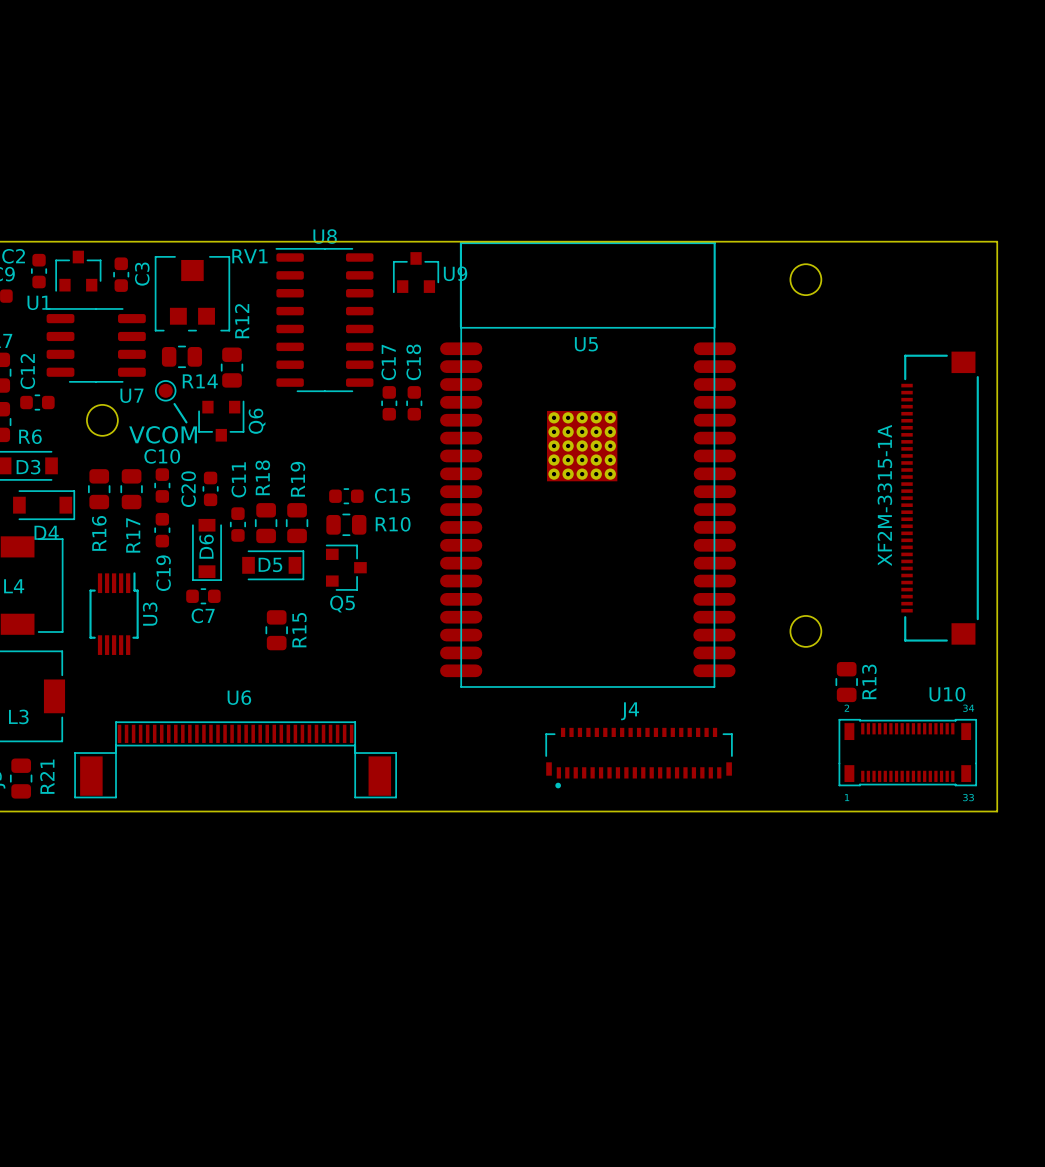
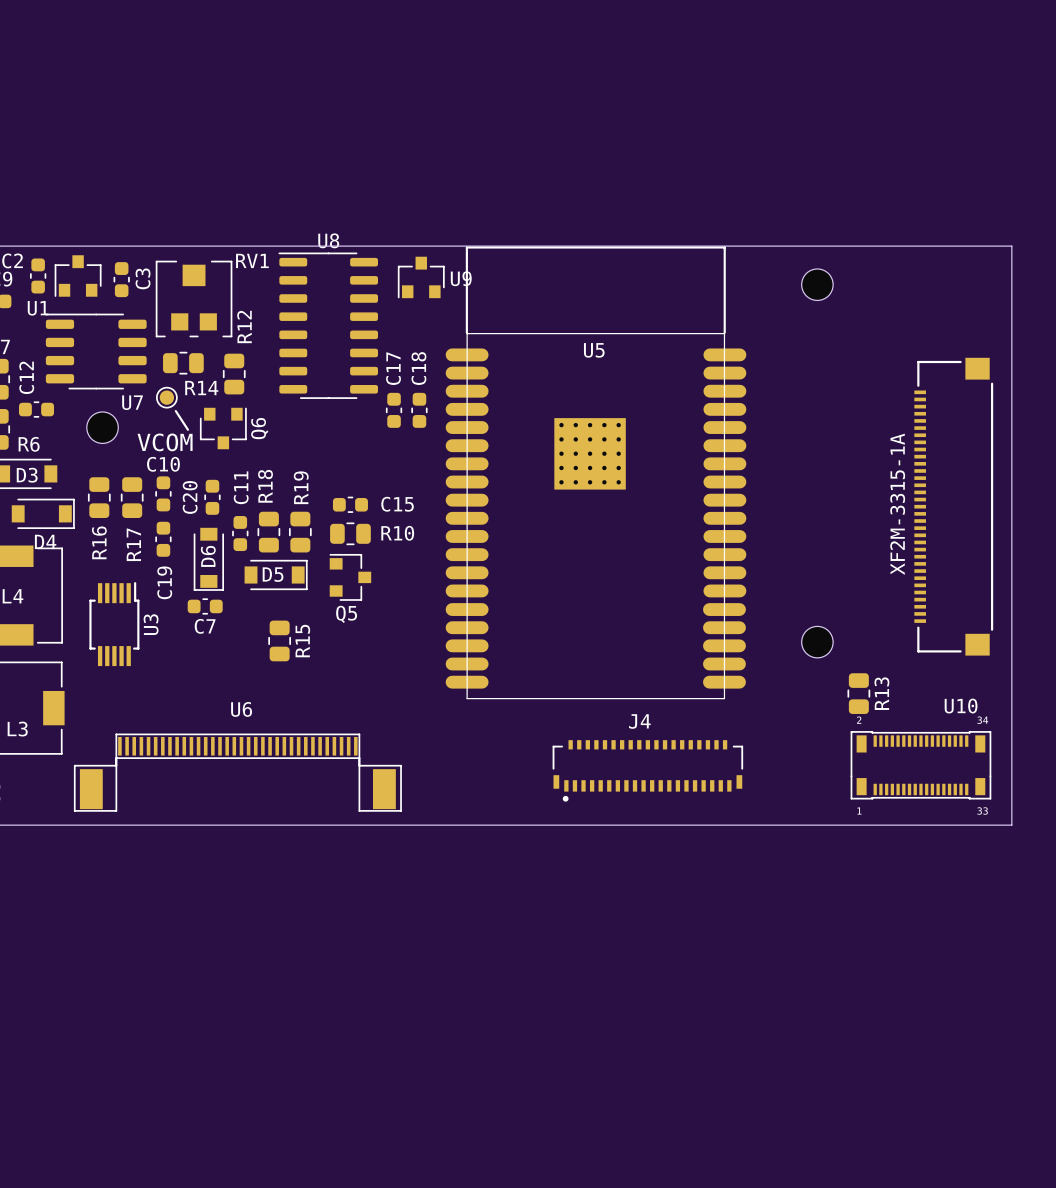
R21: (21, 778) -> none

